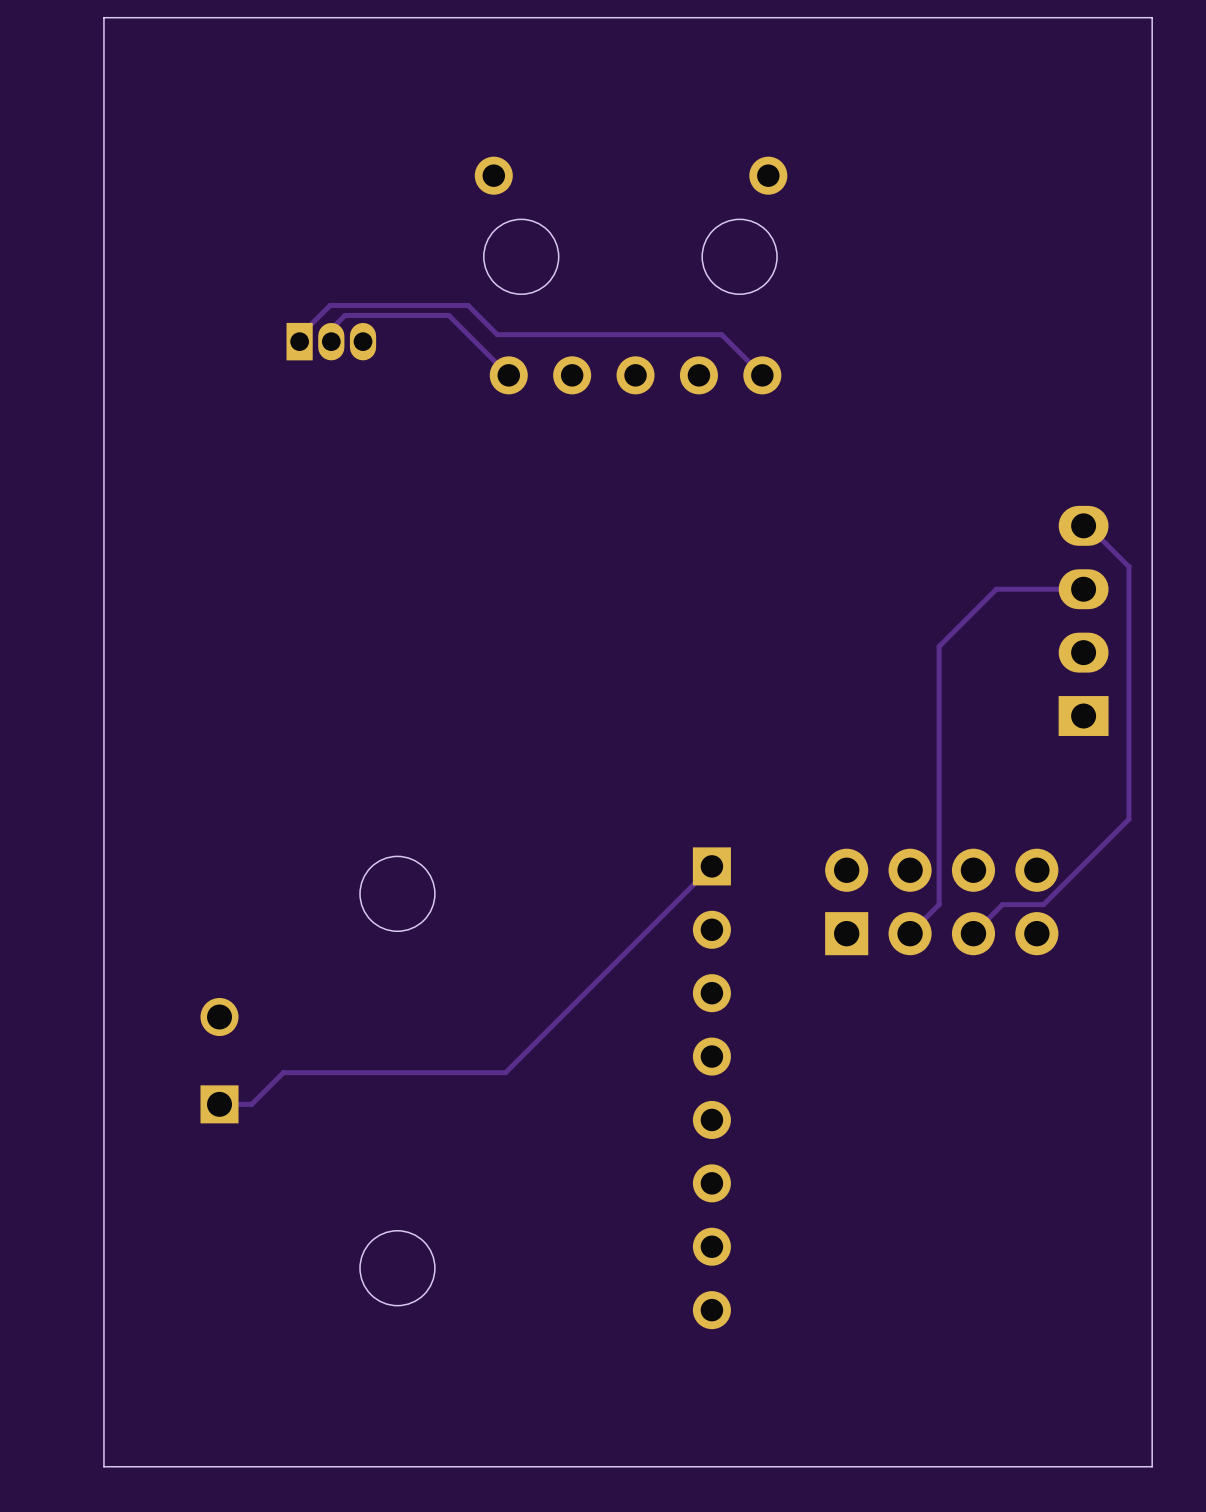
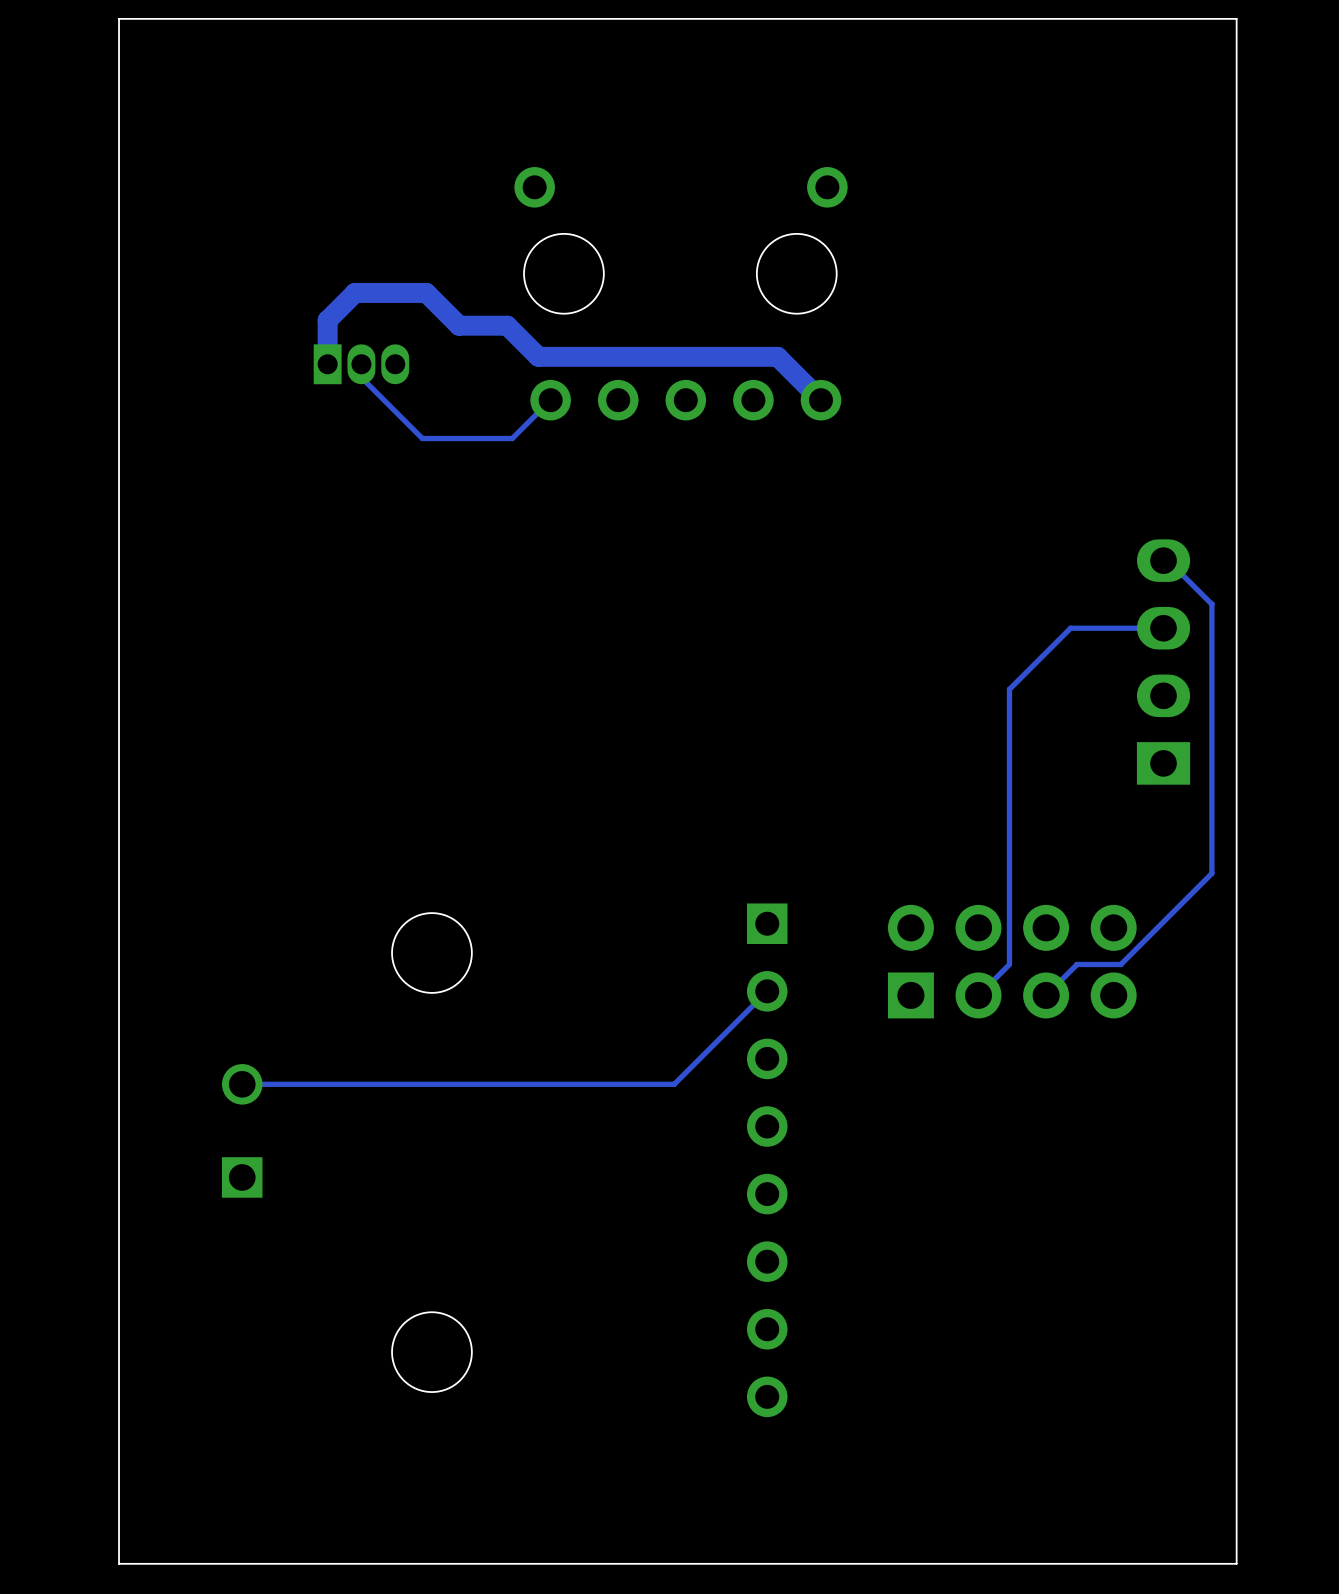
track: (422, 305) (330, 305) (299, 336) -> (459, 325) (426, 292) (355, 292) (327, 320) (327, 358)
track width: thin (422, 305) (468, 305) (497, 334) (721, 334) (762, 375) -> thick (459, 325) (507, 325) (538, 356) (777, 356) (820, 400)
track: (331, 341) (331, 329) (345, 315) (448, 315) (508, 375) -> (361, 364) (361, 377) (422, 438) (512, 438) (550, 400)
track: (711, 866) (505, 1072) (283, 1072) (251, 1104) (219, 1104) -> none
track: none -> (767, 991) (674, 1084) (242, 1084)

